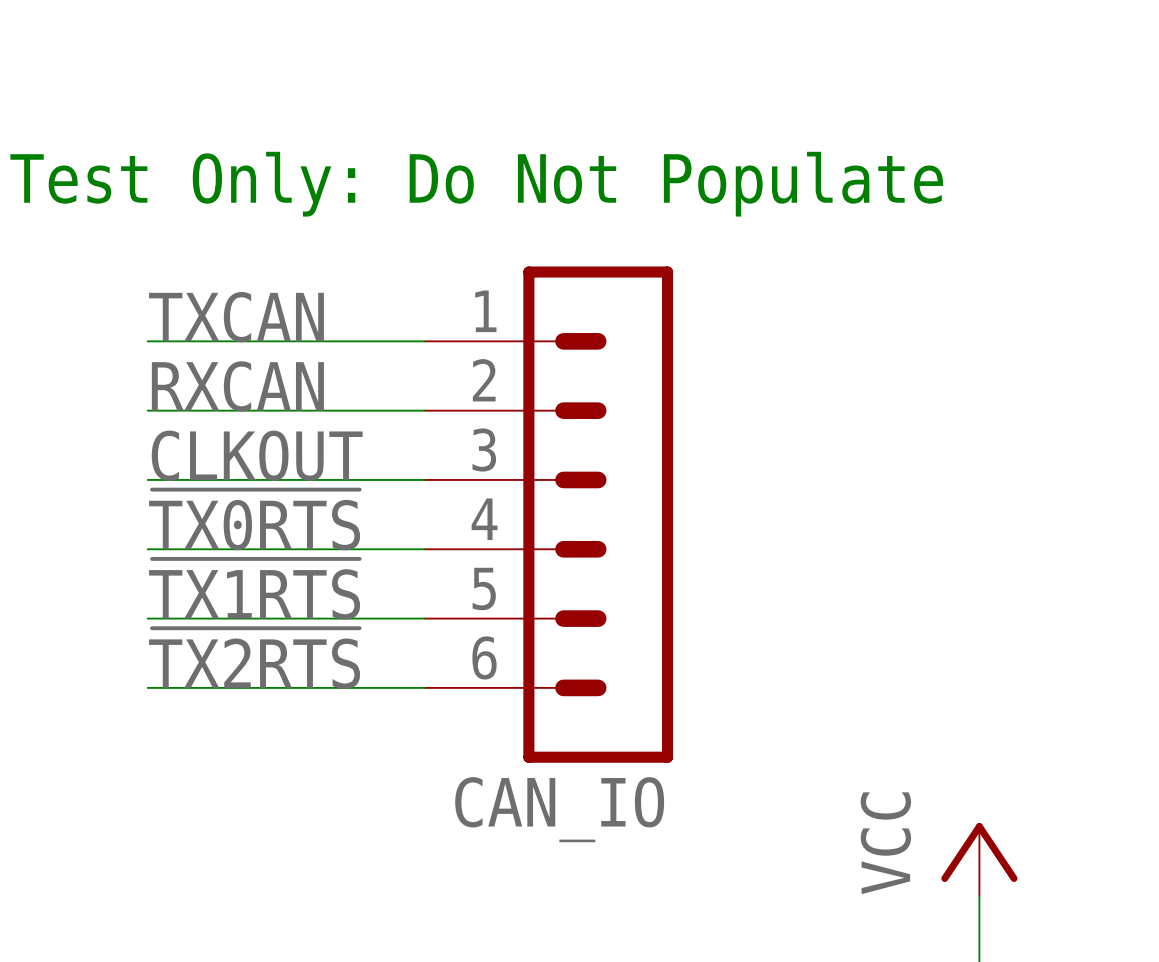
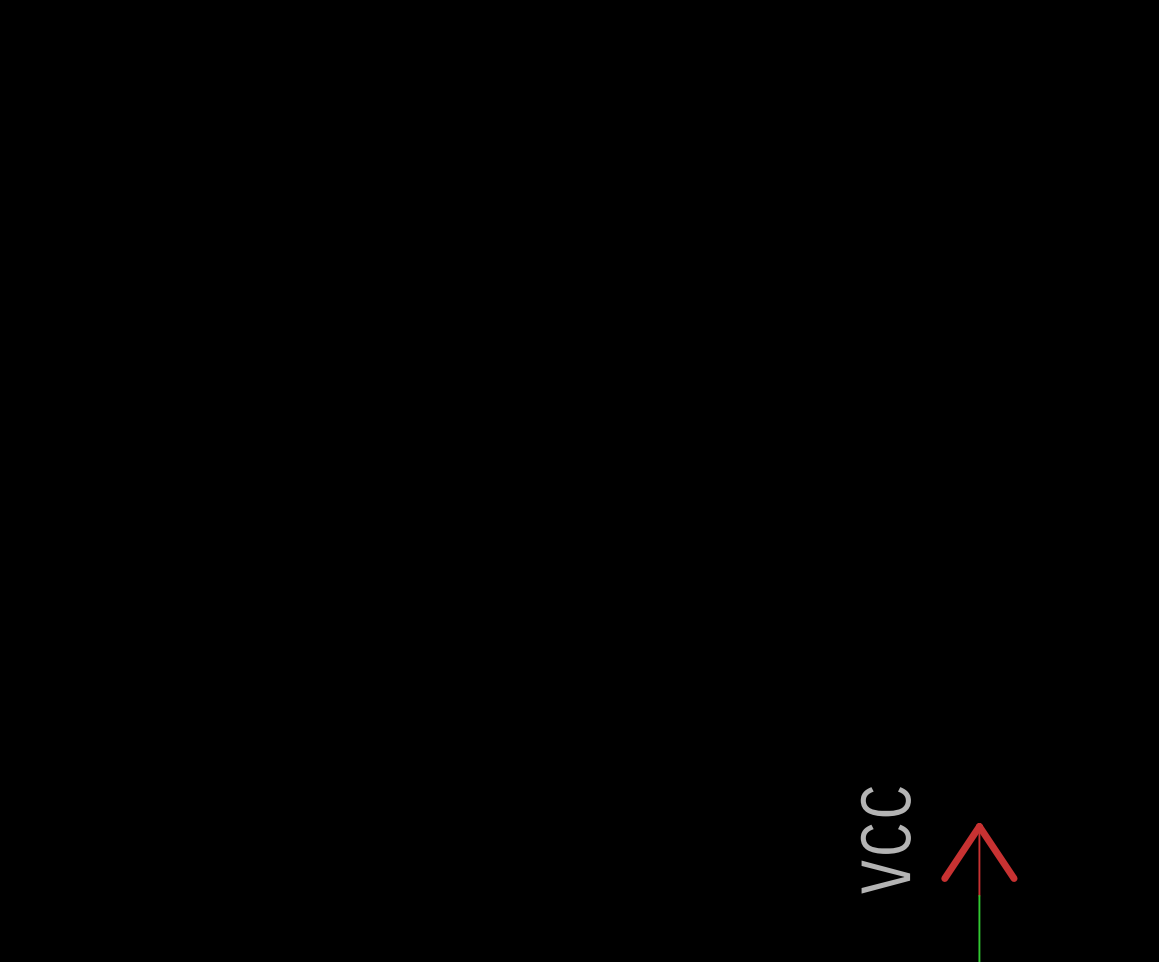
text: Test Only: Do Not Populate (476, 184) -> none
label: TXCAN (236, 317) -> none
wire: (147, 341) (424, 341) -> none
label: RXCAN (237, 386) -> none
wire: (147, 410) (424, 410) -> none
label: CLKOUT (257, 455) -> none
wire: (147, 479) (424, 479) -> none
CAN_IO: (548, 514) -> none
label: ~{TX0RTS} (254, 519) -> none
wire: (147, 549) (424, 549) -> none
label: ~{TX1RTS} (254, 589) -> none
wire: (147, 618) (424, 618) -> none
label: ~{TX2RTS} (254, 658) -> none
wire: (147, 687) (424, 687) -> none

